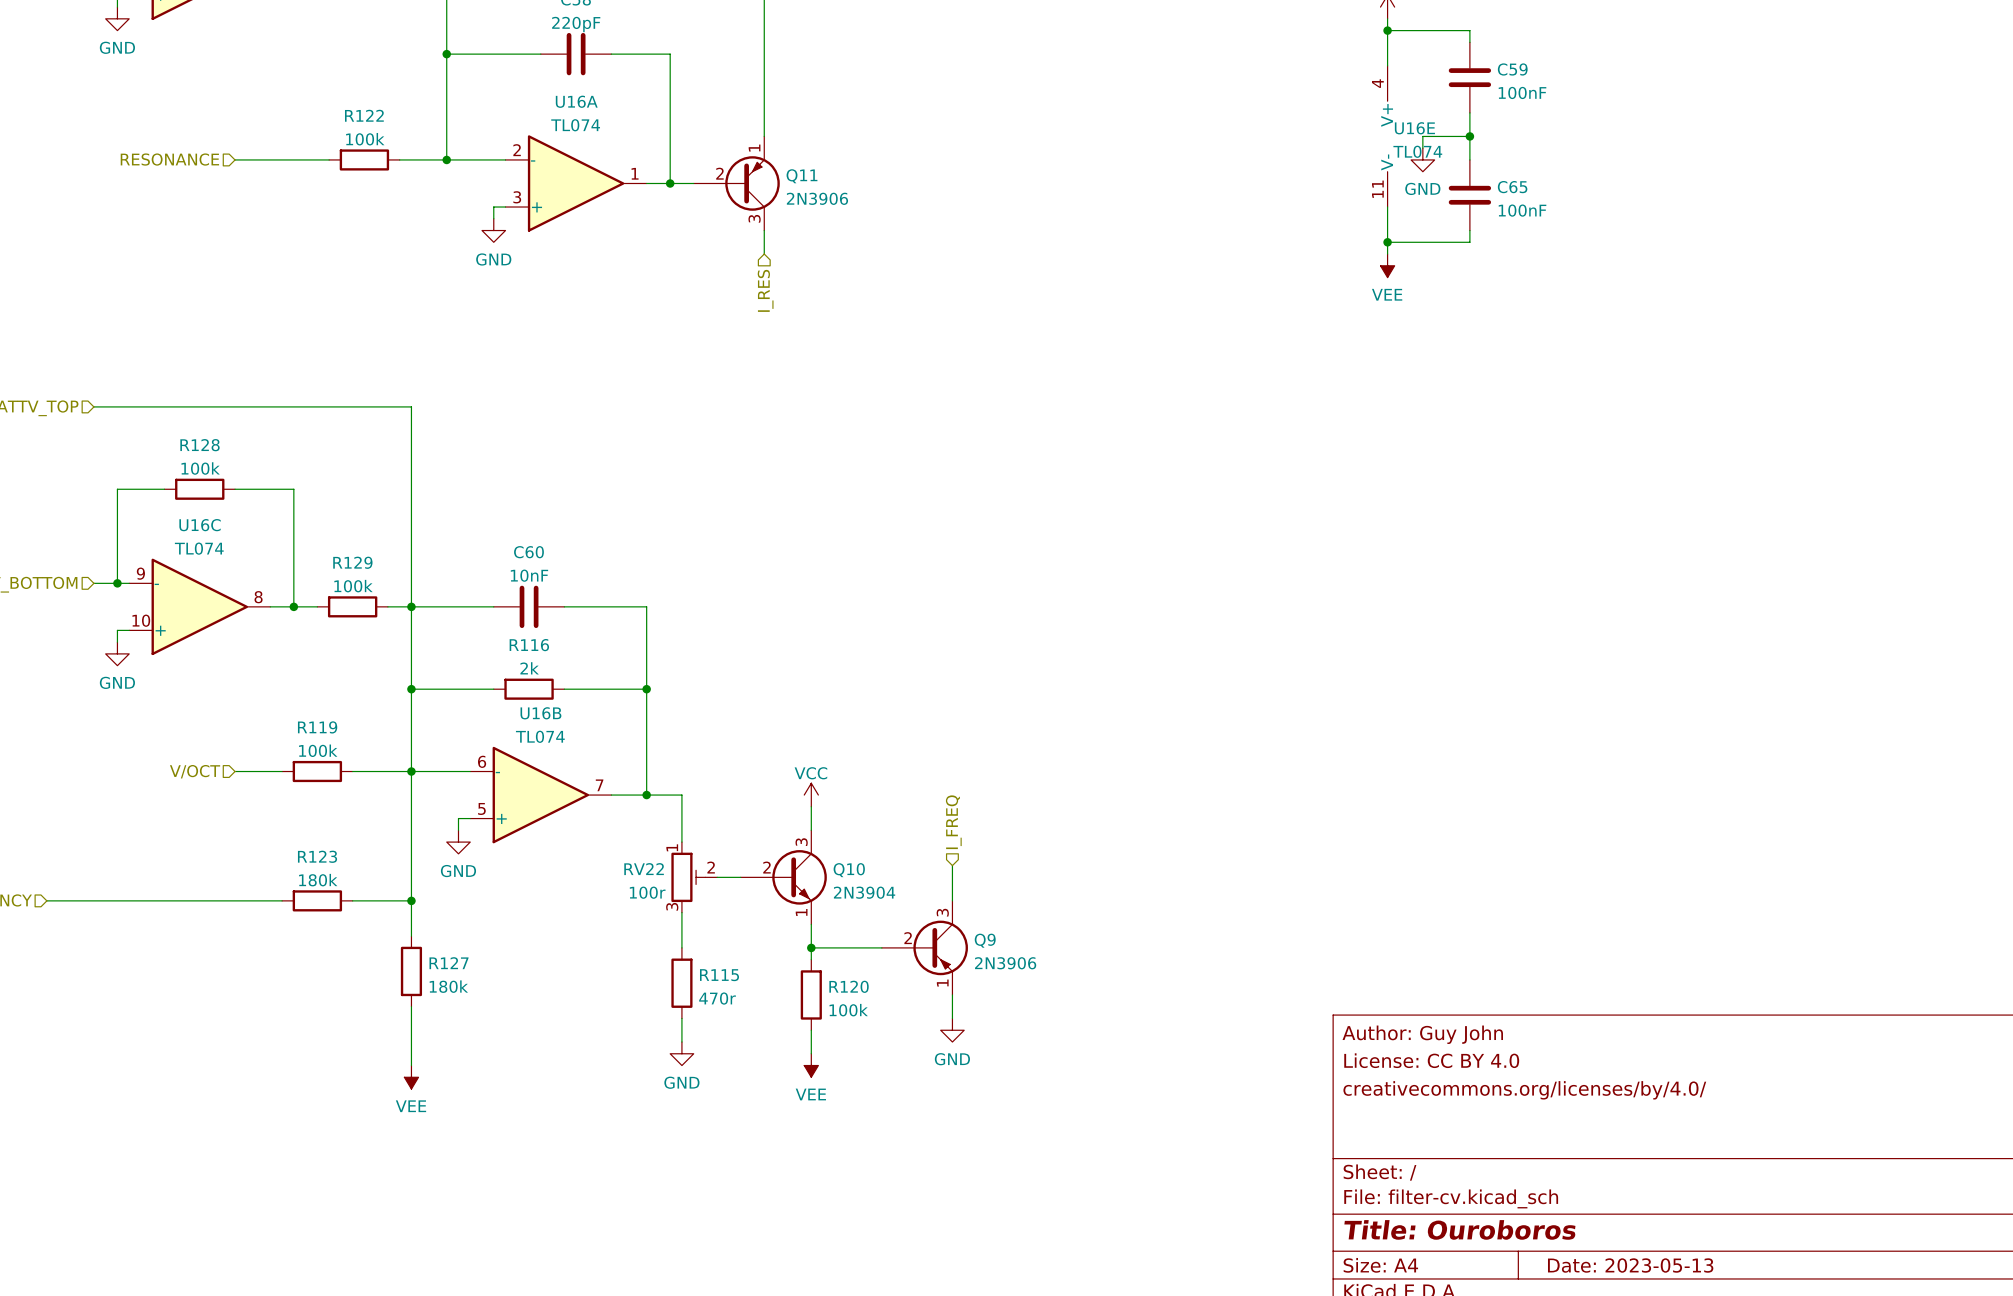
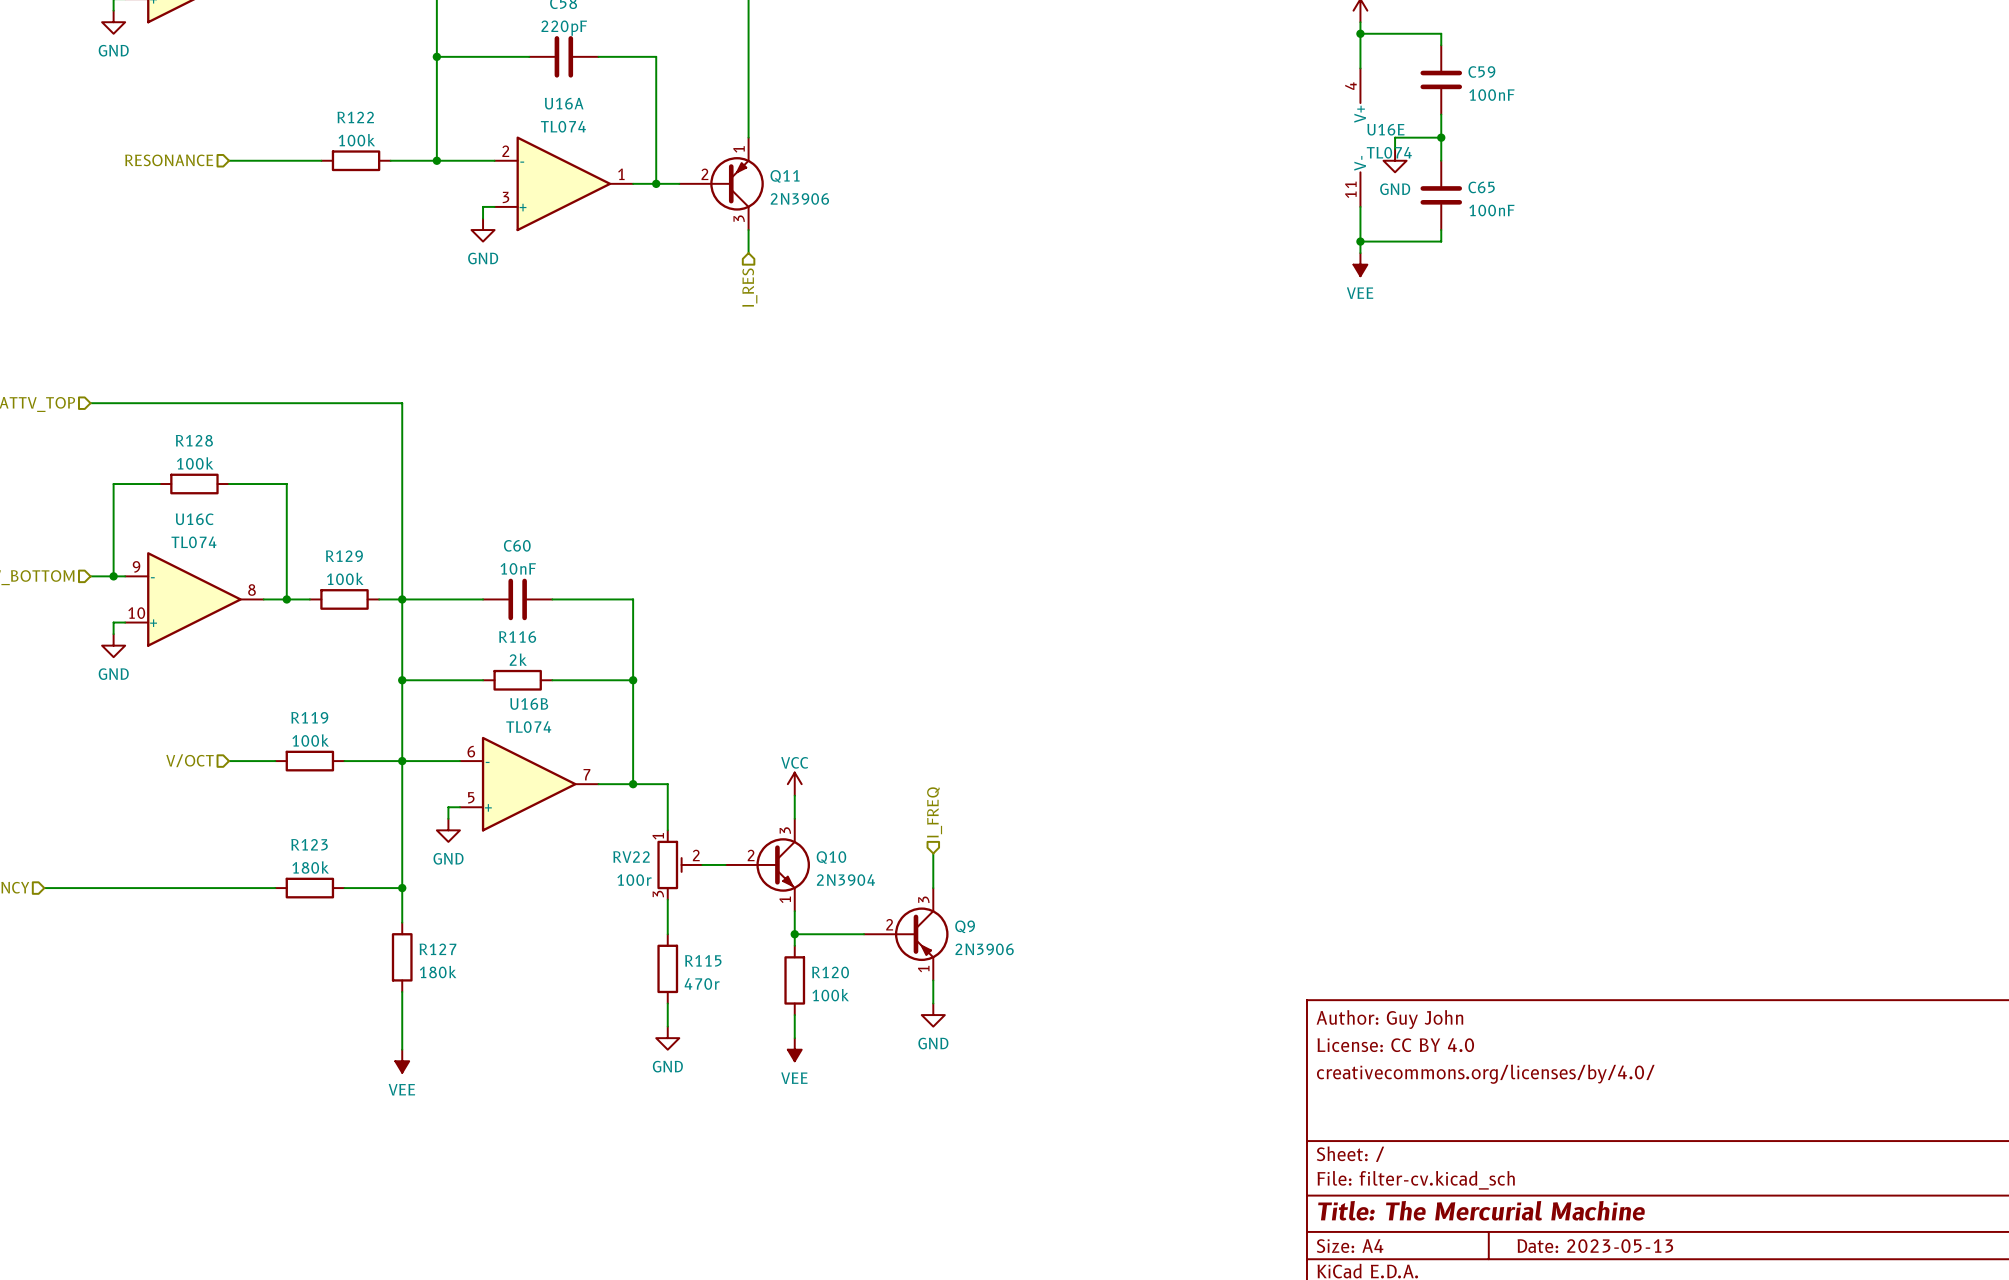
title block: Title: Ouroboros (1459, 1229) -> Title: The Mercurial Machine (1481, 1210)

